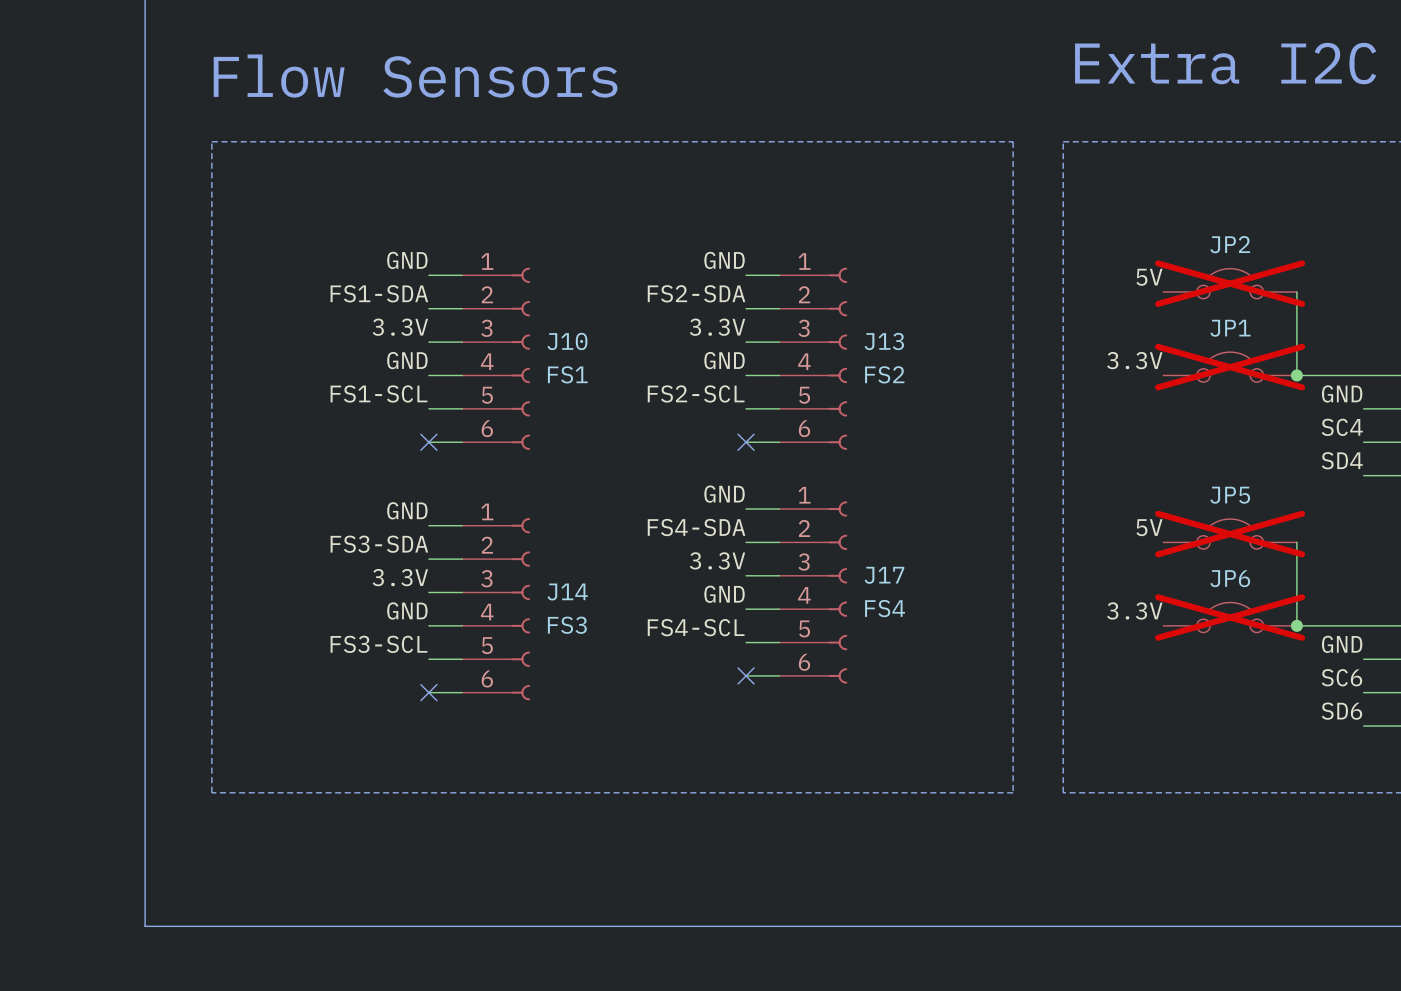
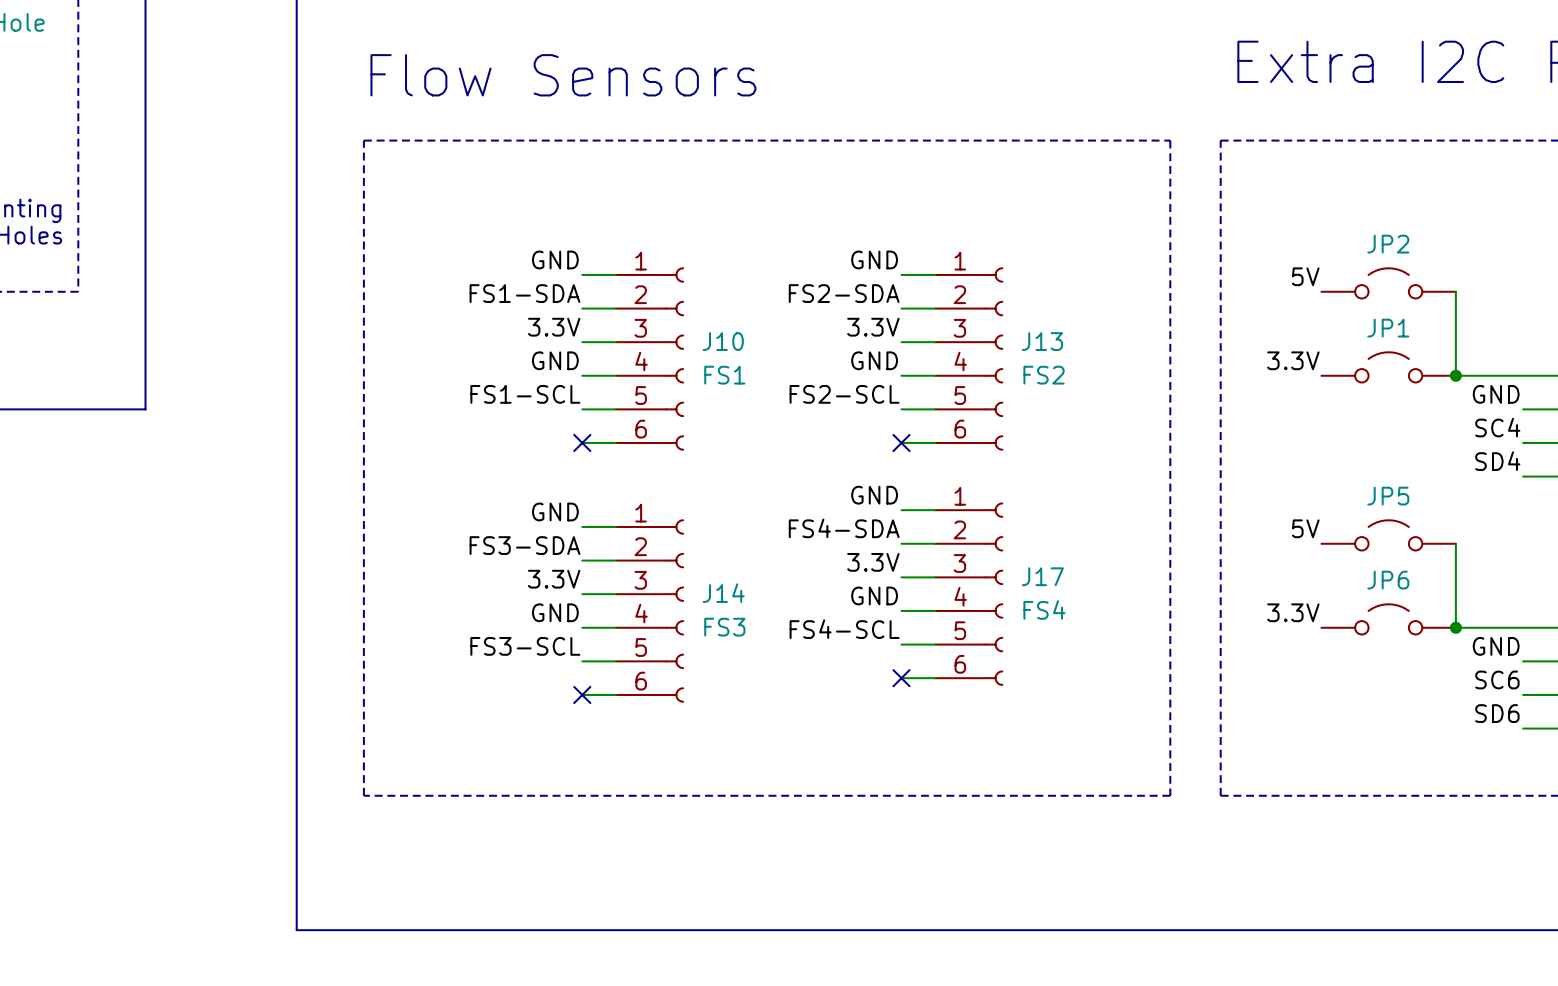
JP2 do-not-place cross: (1230, 283) -> none
JP1 do-not-place cross: (1230, 367) -> none
JP5 do-not-place cross: (1230, 534) -> none
JP6 do-not-place cross: (1230, 617) -> none

